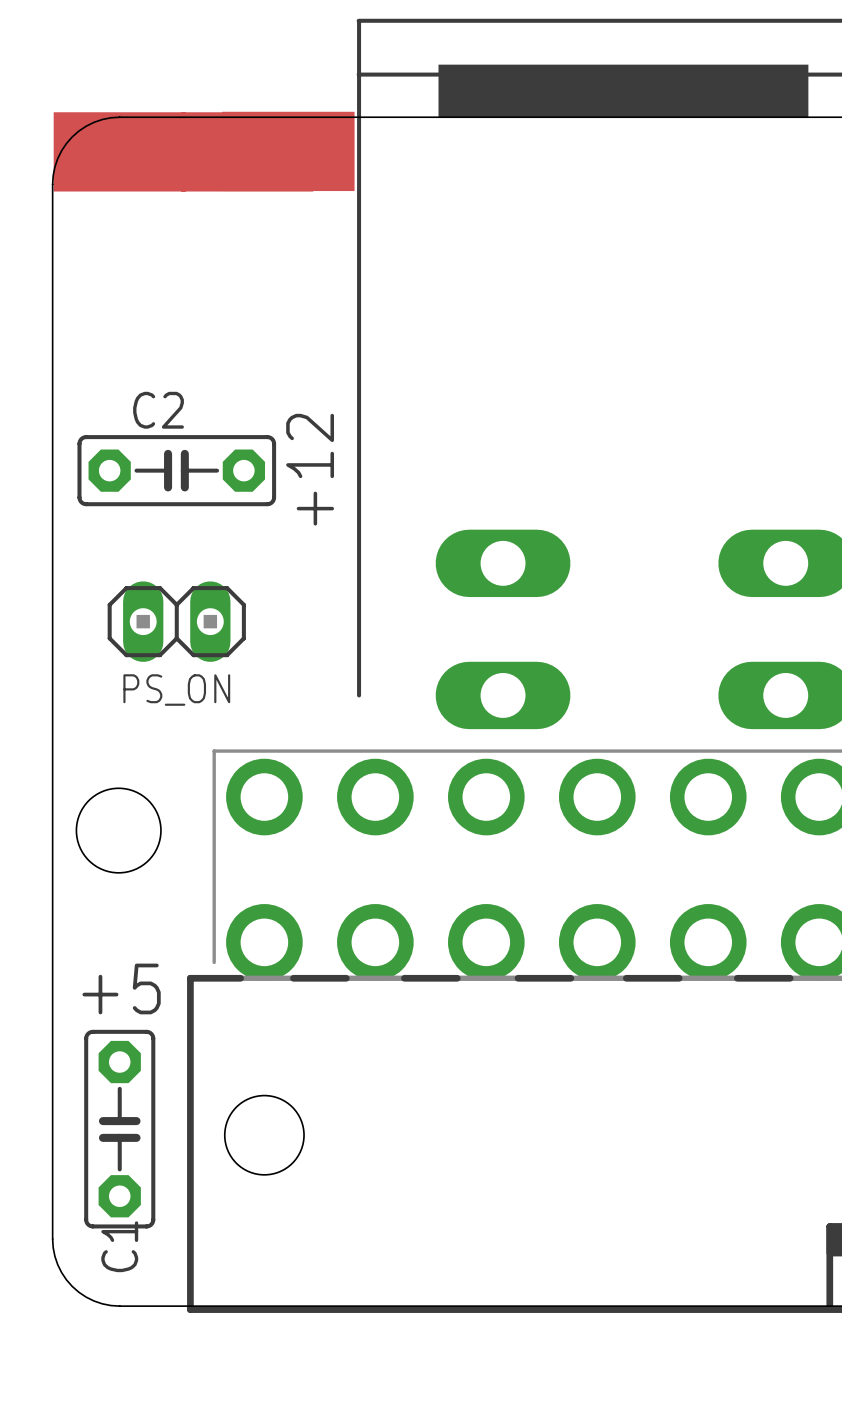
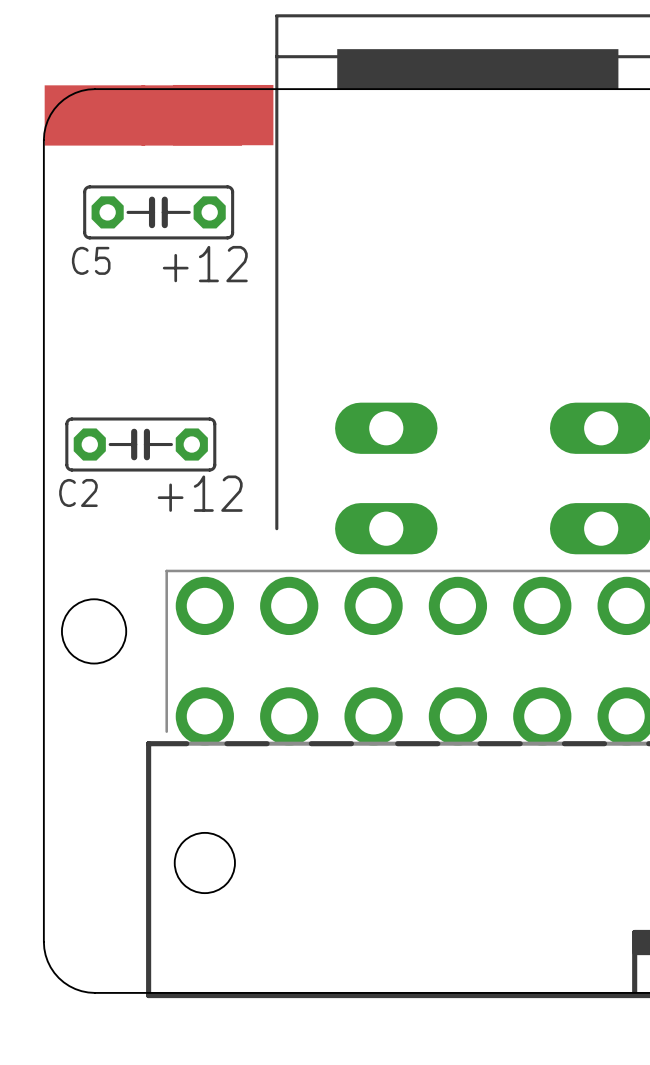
C5: none -> (158, 212)
text: none -> +12 (205, 264)
C2 name position: C2 (158, 410) -> C2 (78, 492)
text: +12 (310, 469) -> none
C2 position: (176, 470) -> (140, 444)
part: (176, 621) -> none
text: none -> +12 (200, 493)
text: PS_ON (176, 690) -> none
text: +5 (121, 988) -> none
C1: (119, 1129) -> none

